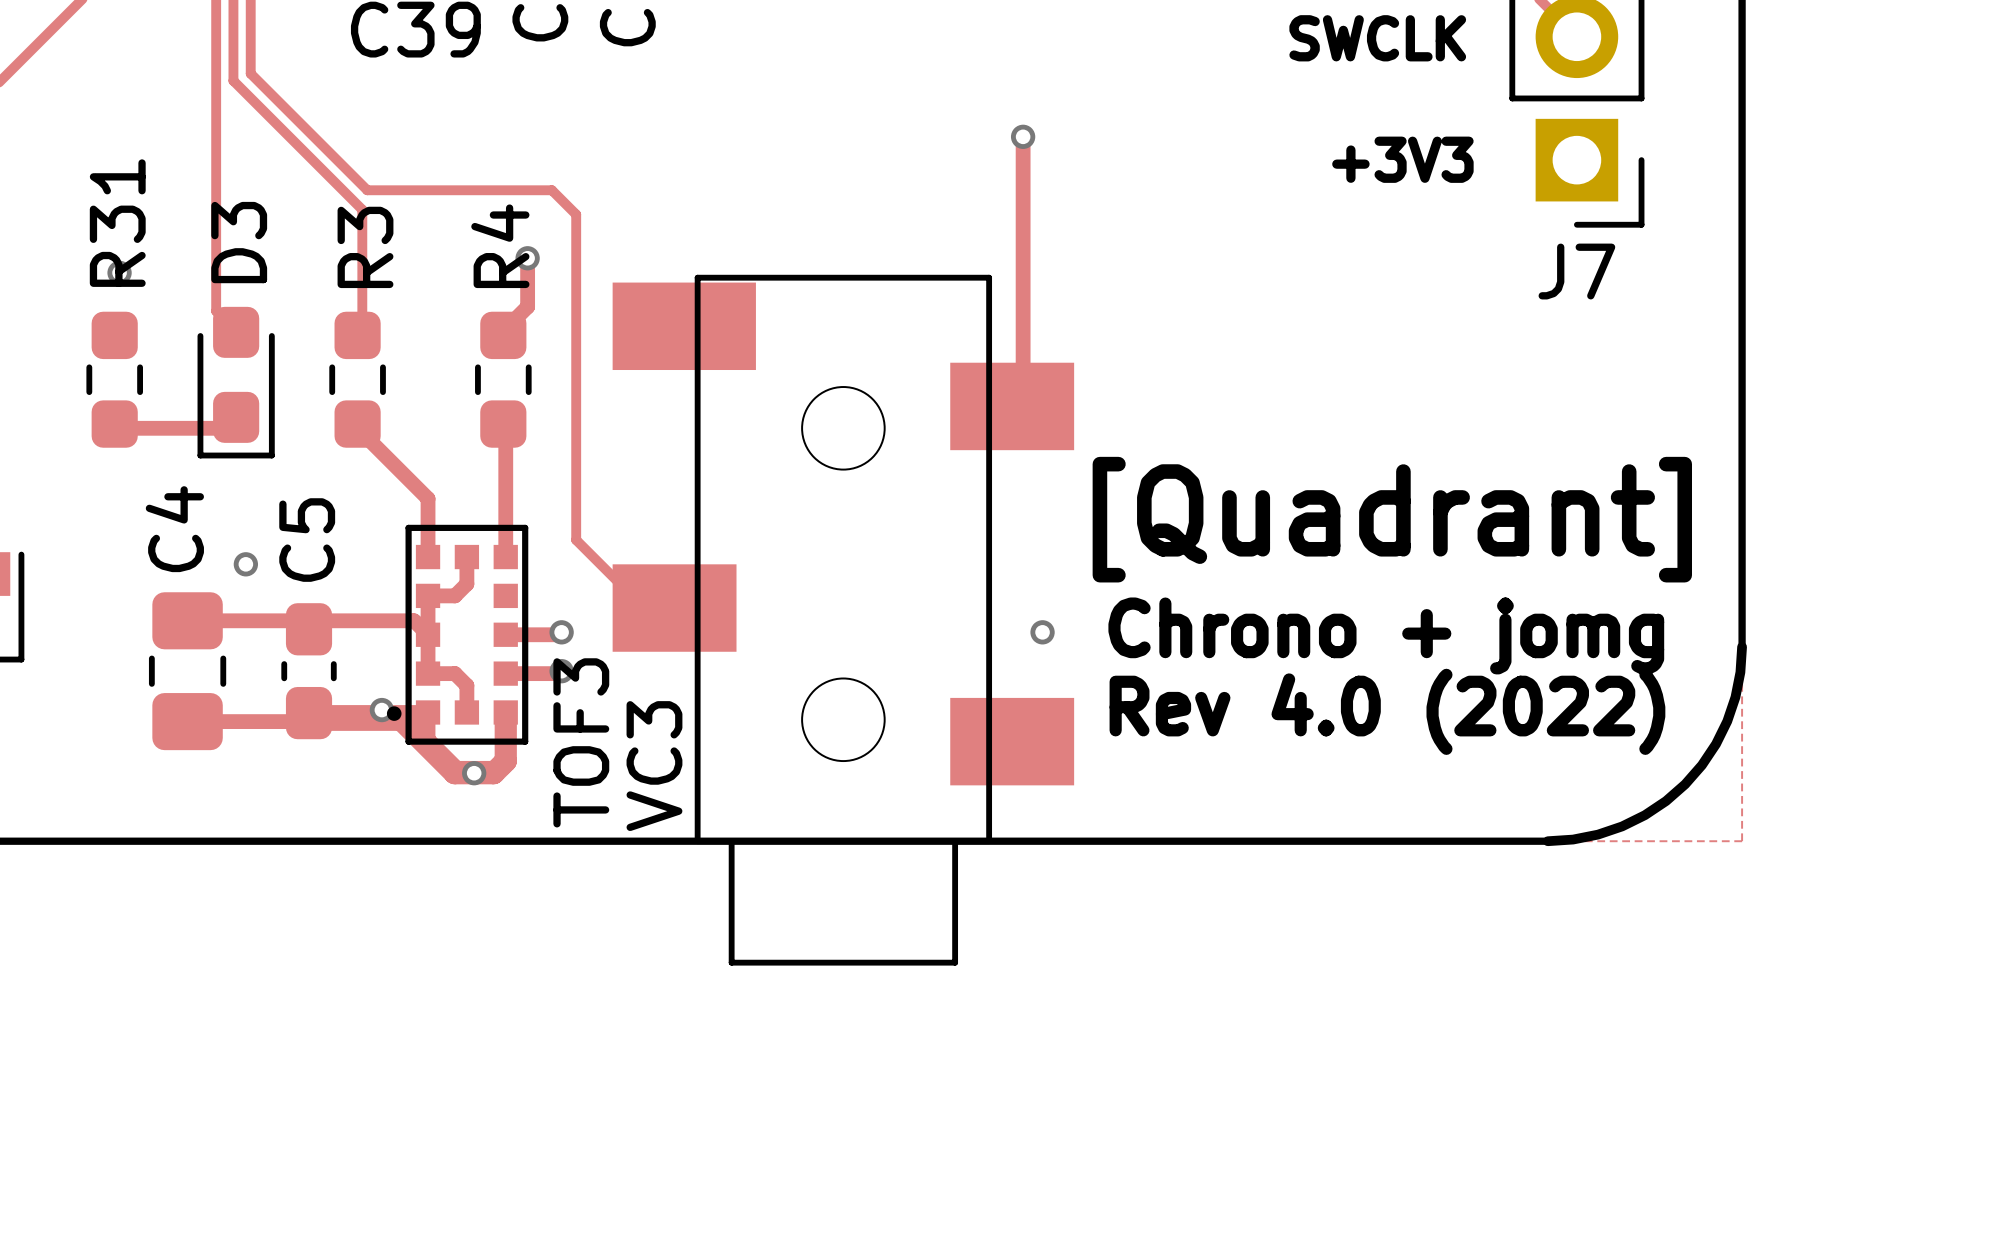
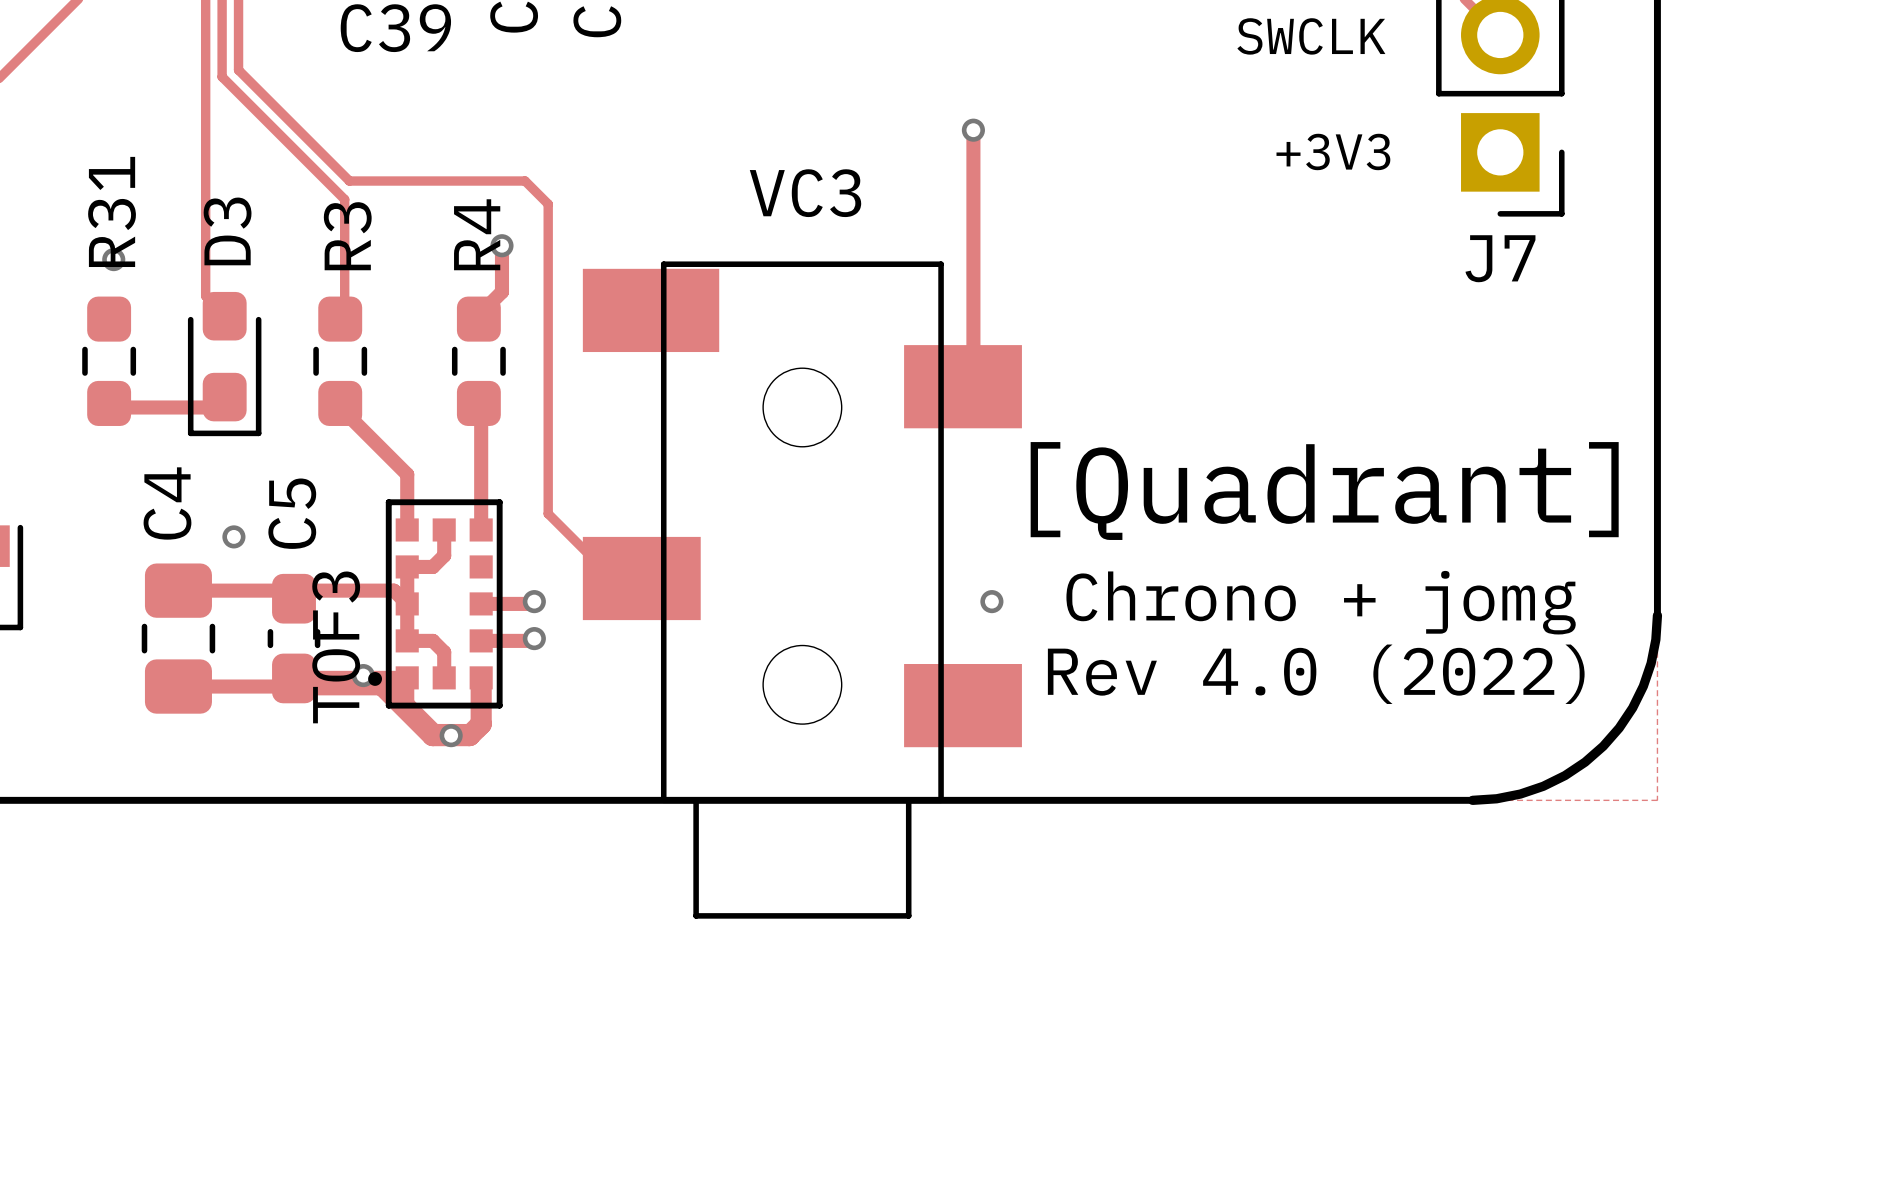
TOF3 name position: TOF3 (581, 742) -> TOF3 (336, 647)
VC3 name rotation: 0° (654, 766) -> 90° clockwise (805, 193)
VC3 name position: VC3 (654, 766) -> VC3 (805, 193)

